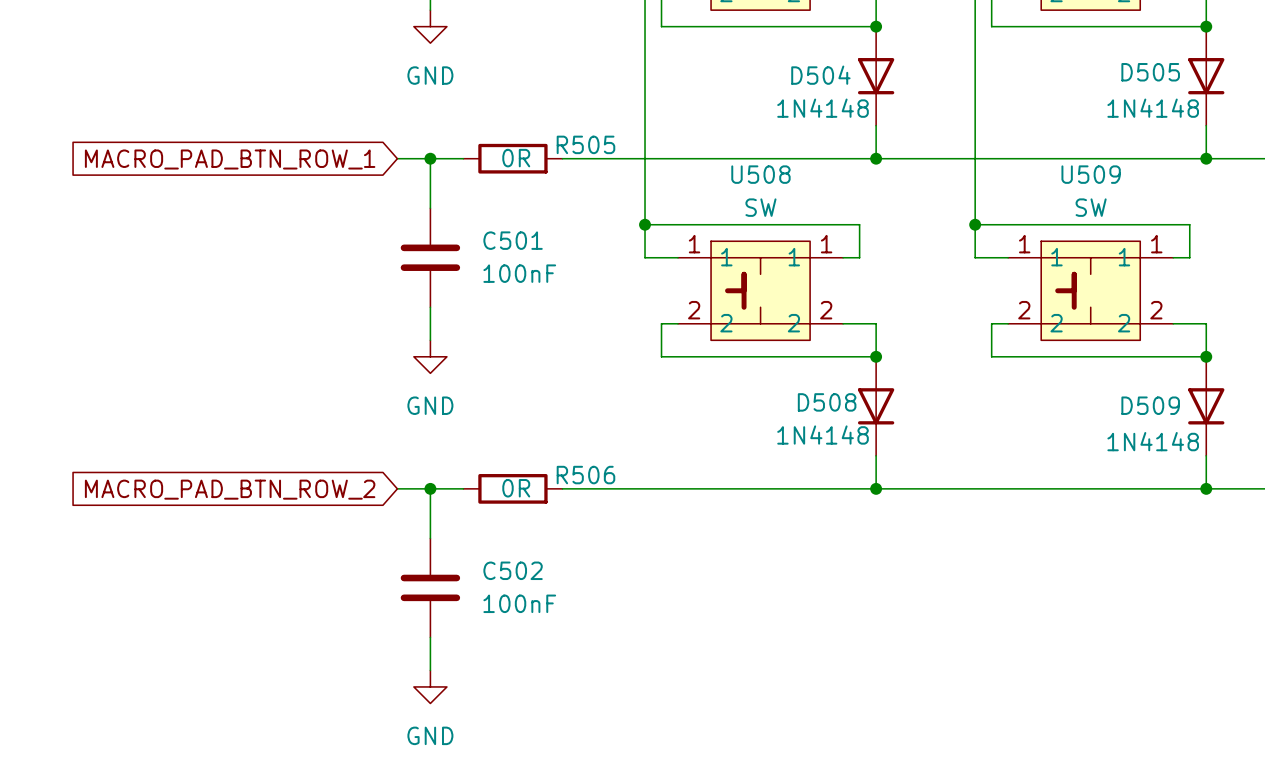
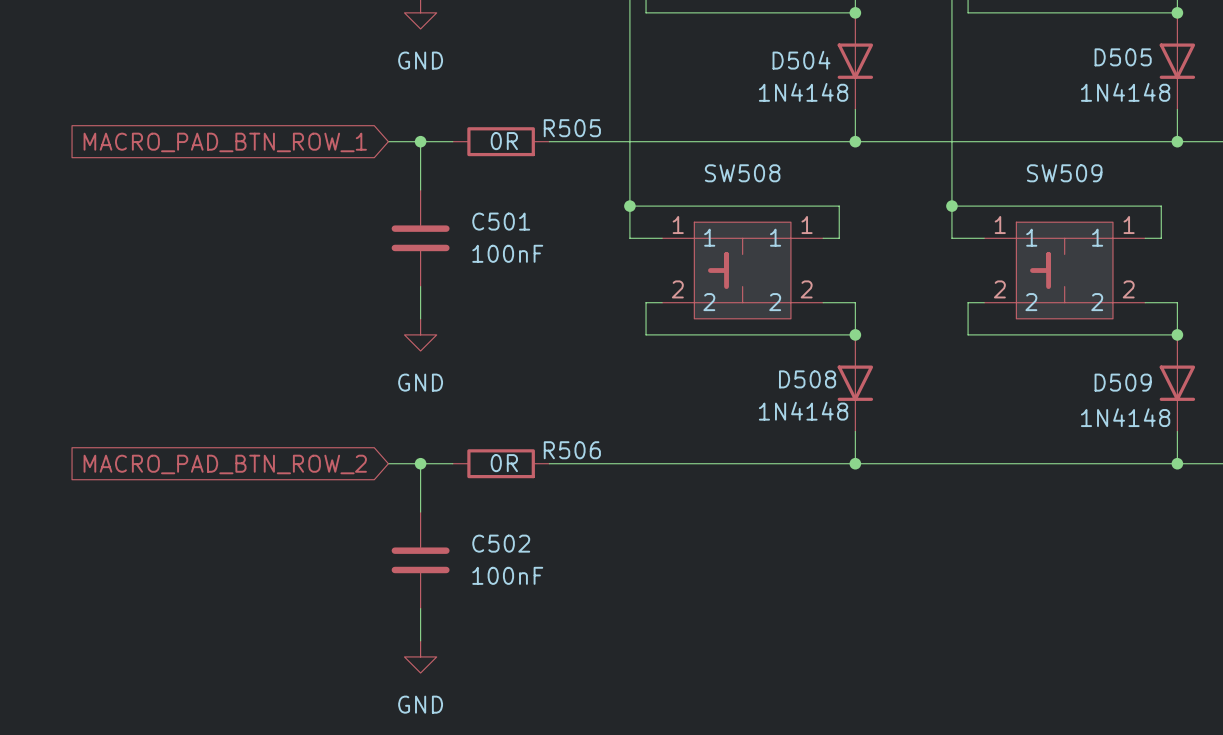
U508 name: U508 (760, 174) -> SW508 (742, 173)
U509 name: U509 (1091, 174) -> SW509 (1064, 173)
U508 value: SW (760, 207) -> none
U509 value: SW (1091, 207) -> none

